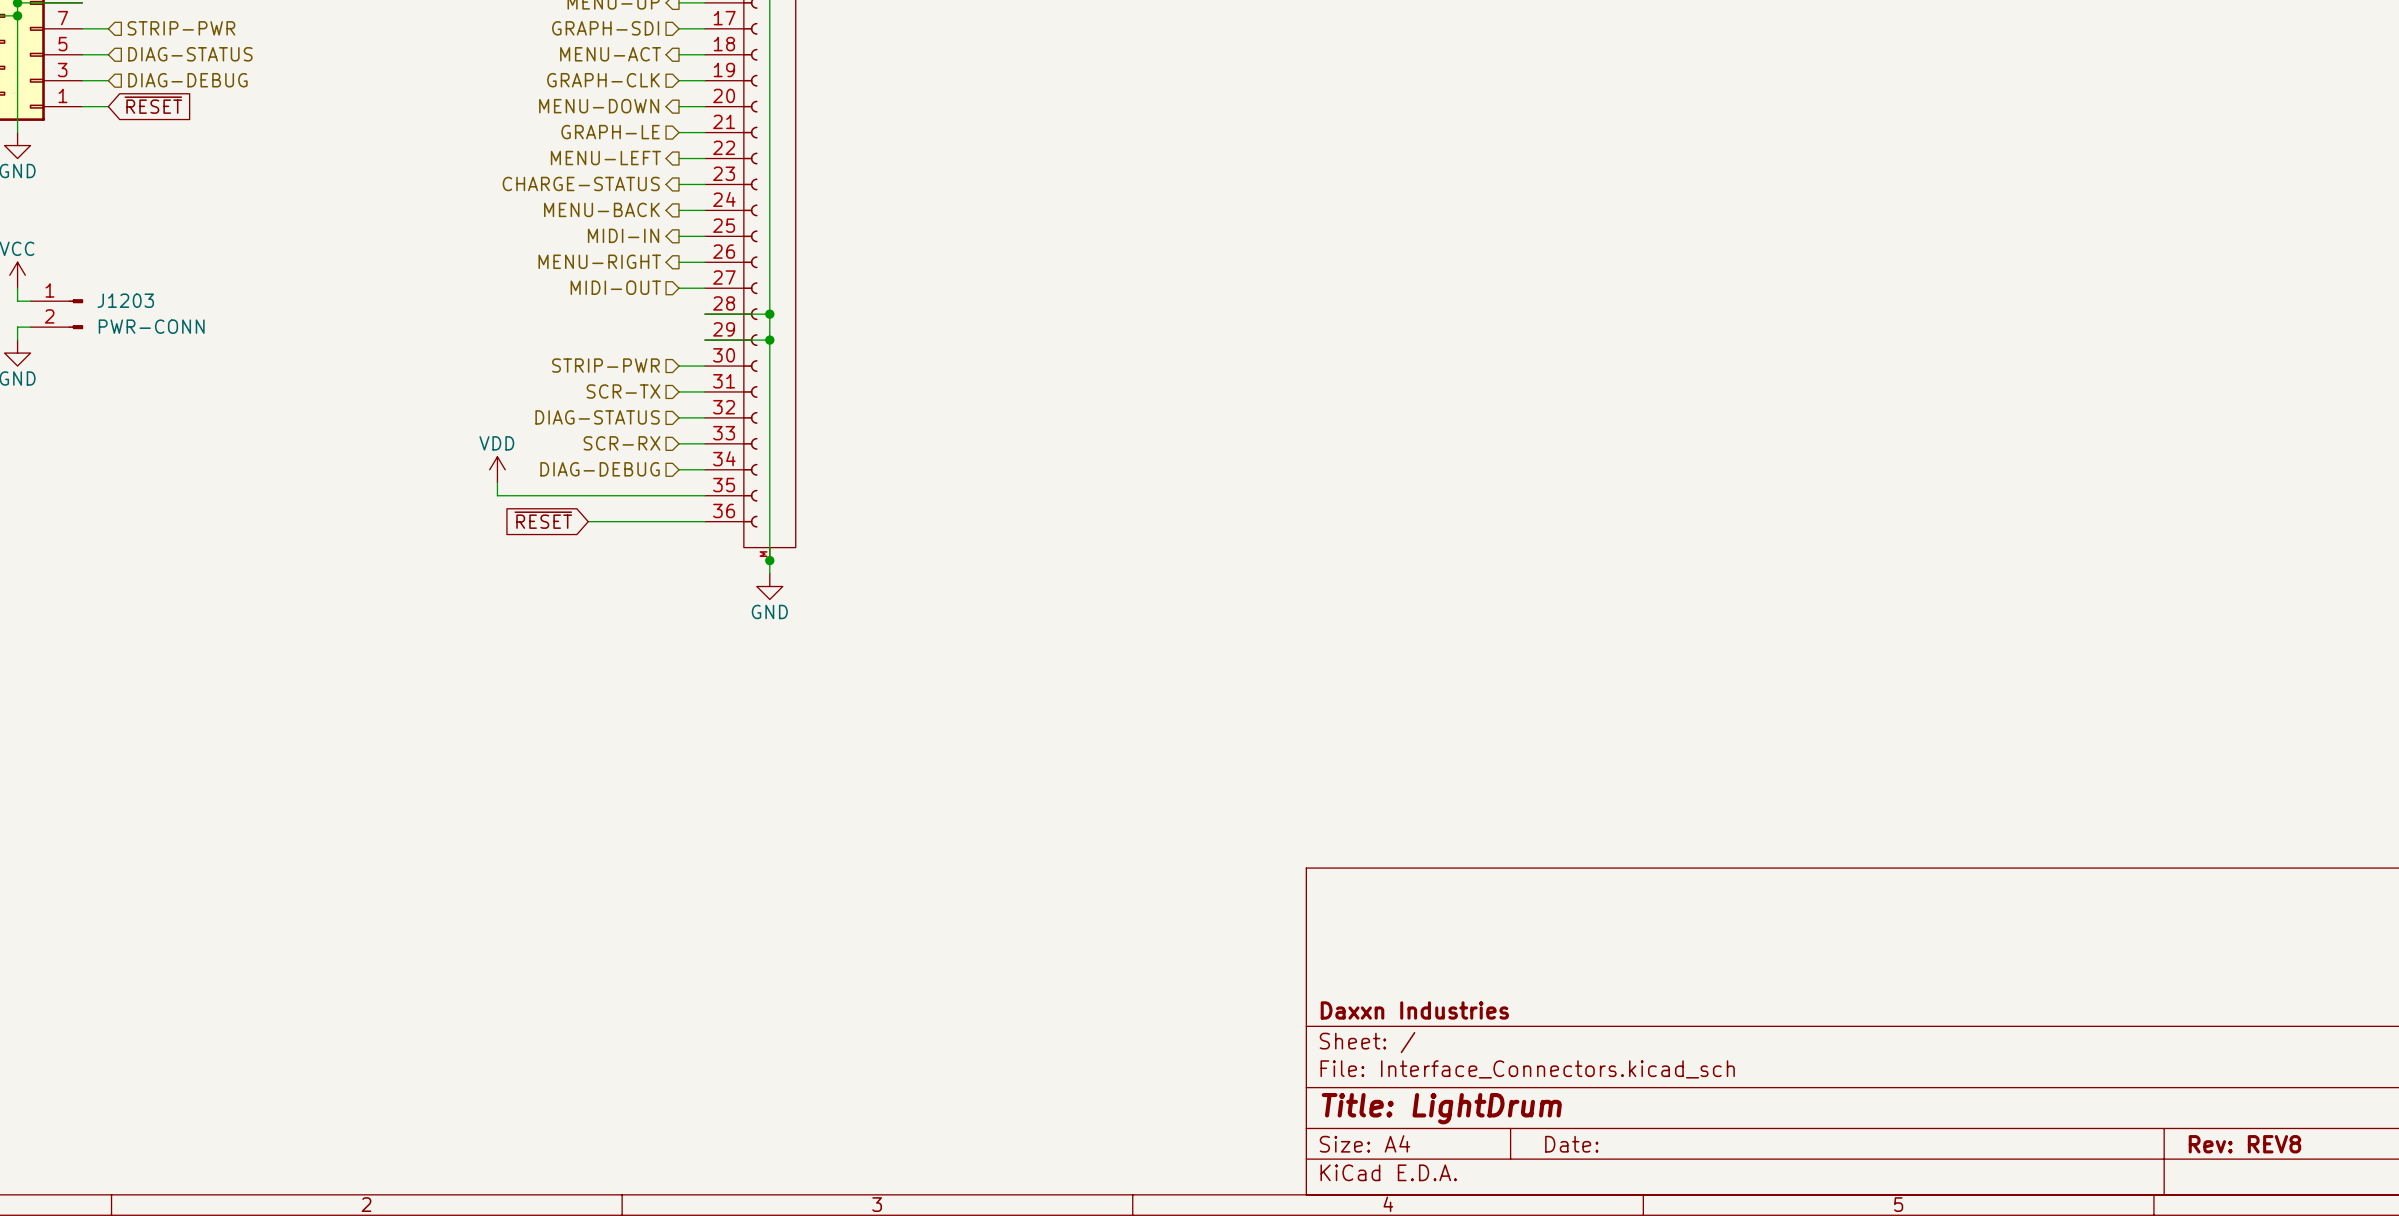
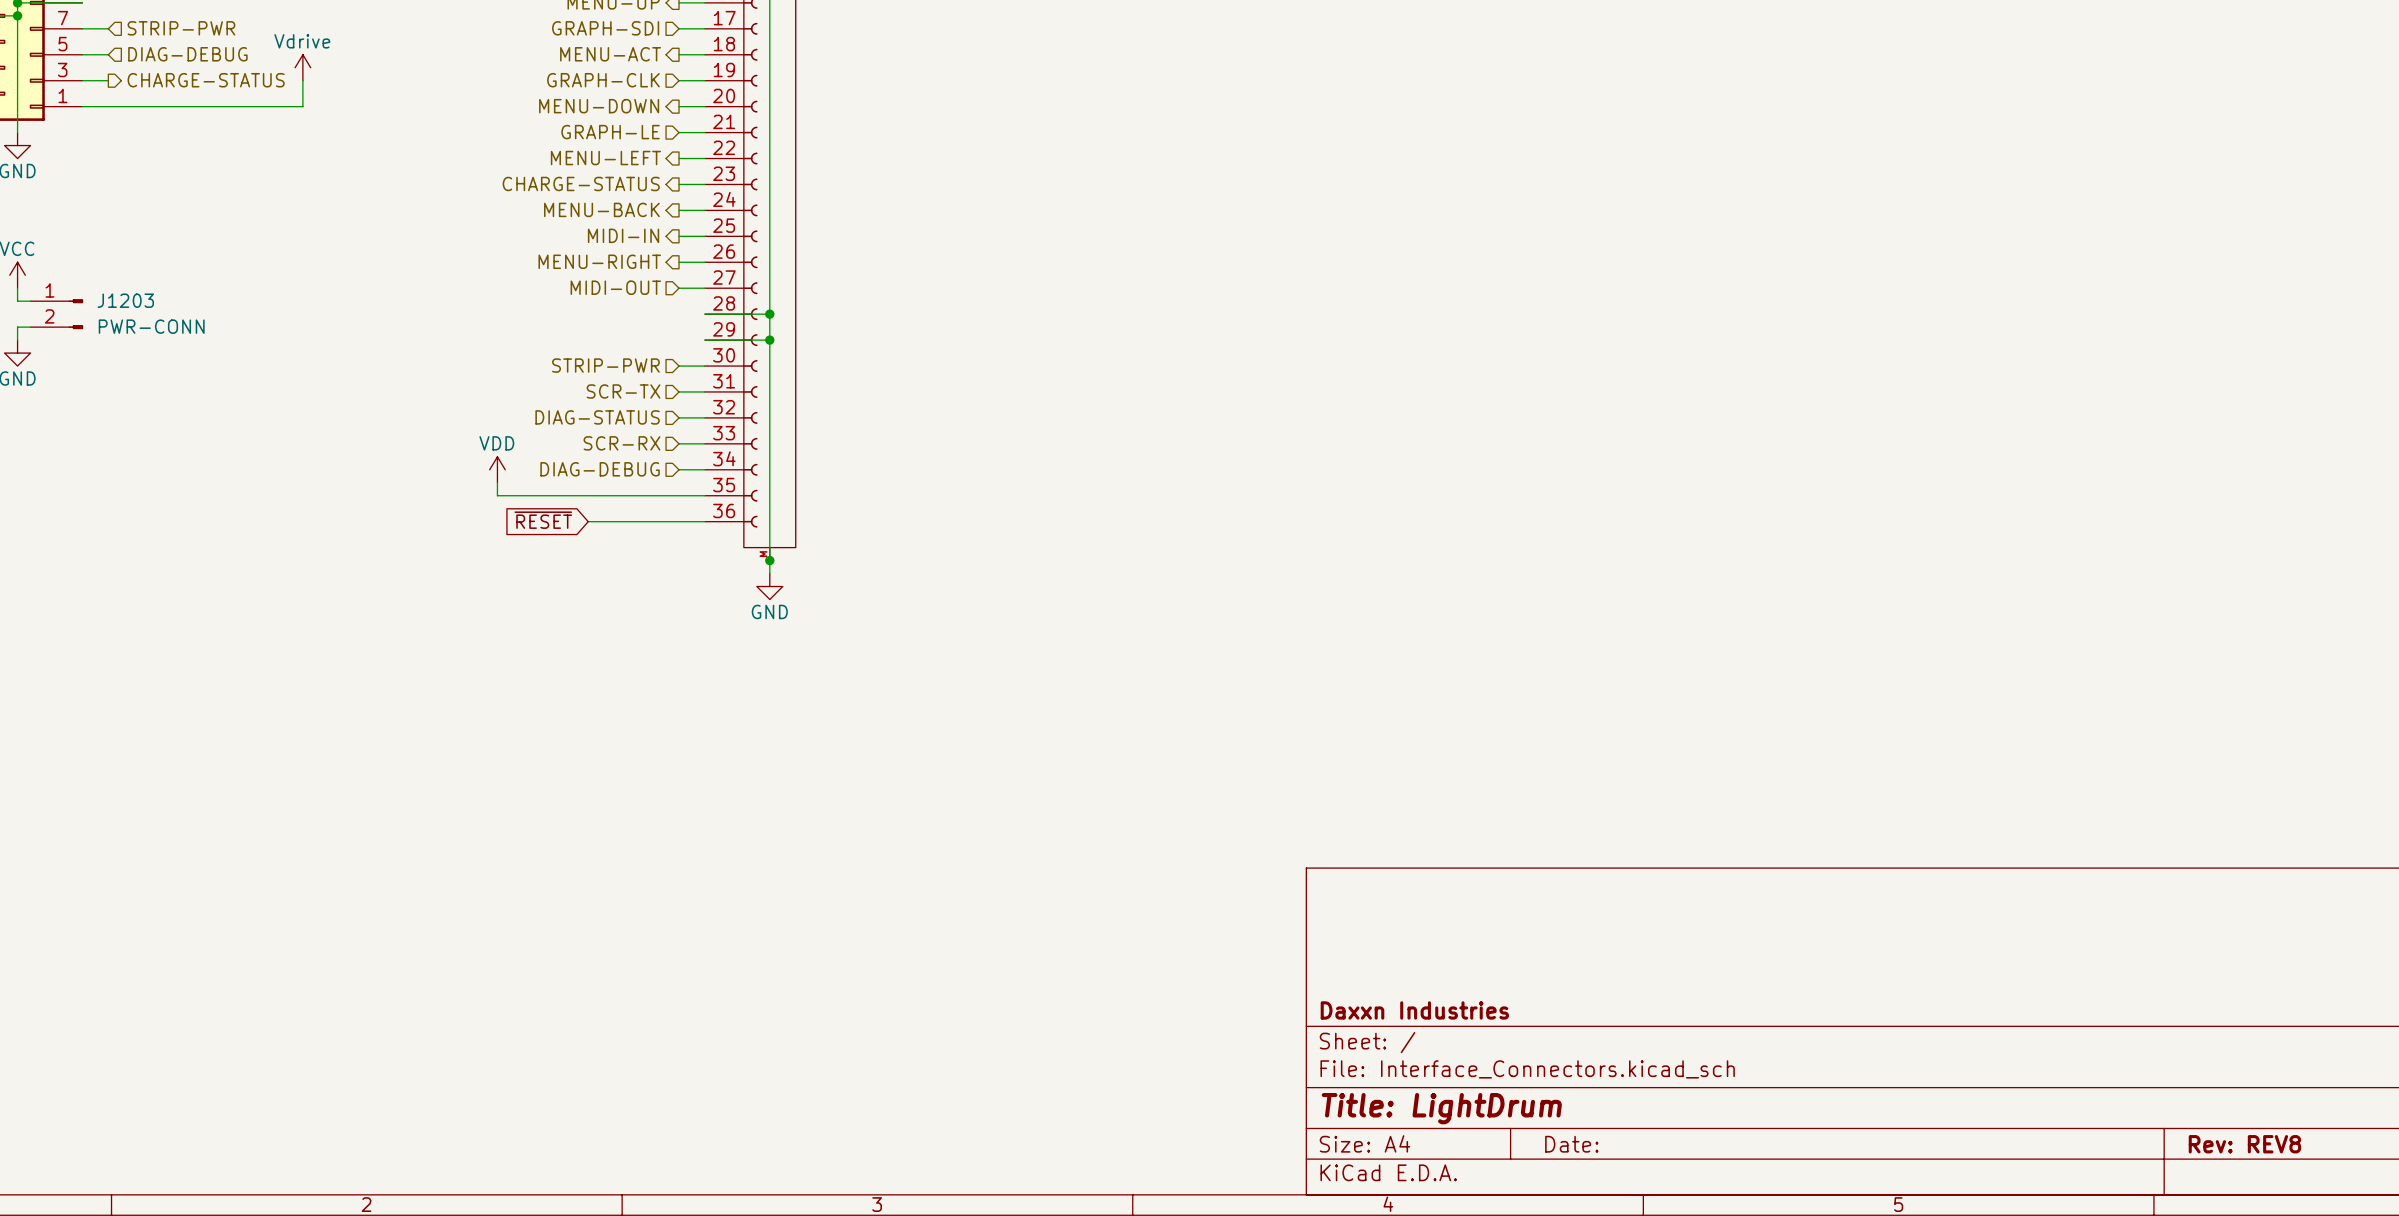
hierarchical label: DIAG-STATUS (190, 54) -> DIAG-DEBUG (187, 54)
power symbol: none -> Vdrive (302, 67)
hierarchical label shape: input (187, 80) -> output (206, 80)
hierarchical label: DIAG-DEBUG (187, 80) -> CHARGE-STATUS (206, 80)
wire: none -> (302, 80) (302, 106) (108, 106)
global label: ~{RESET} (153, 105) -> none

